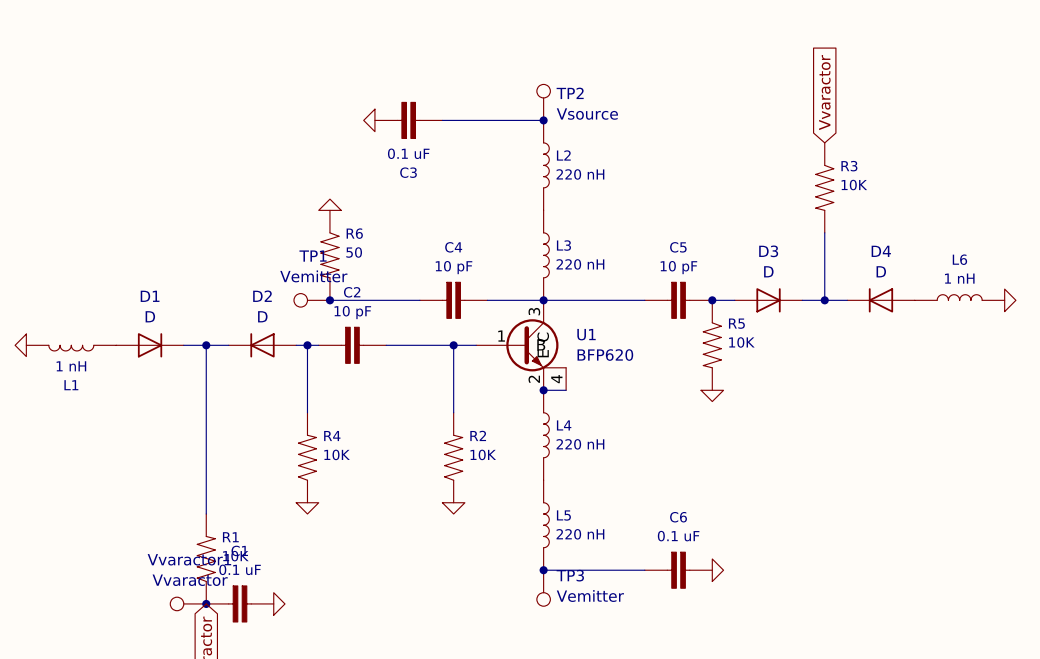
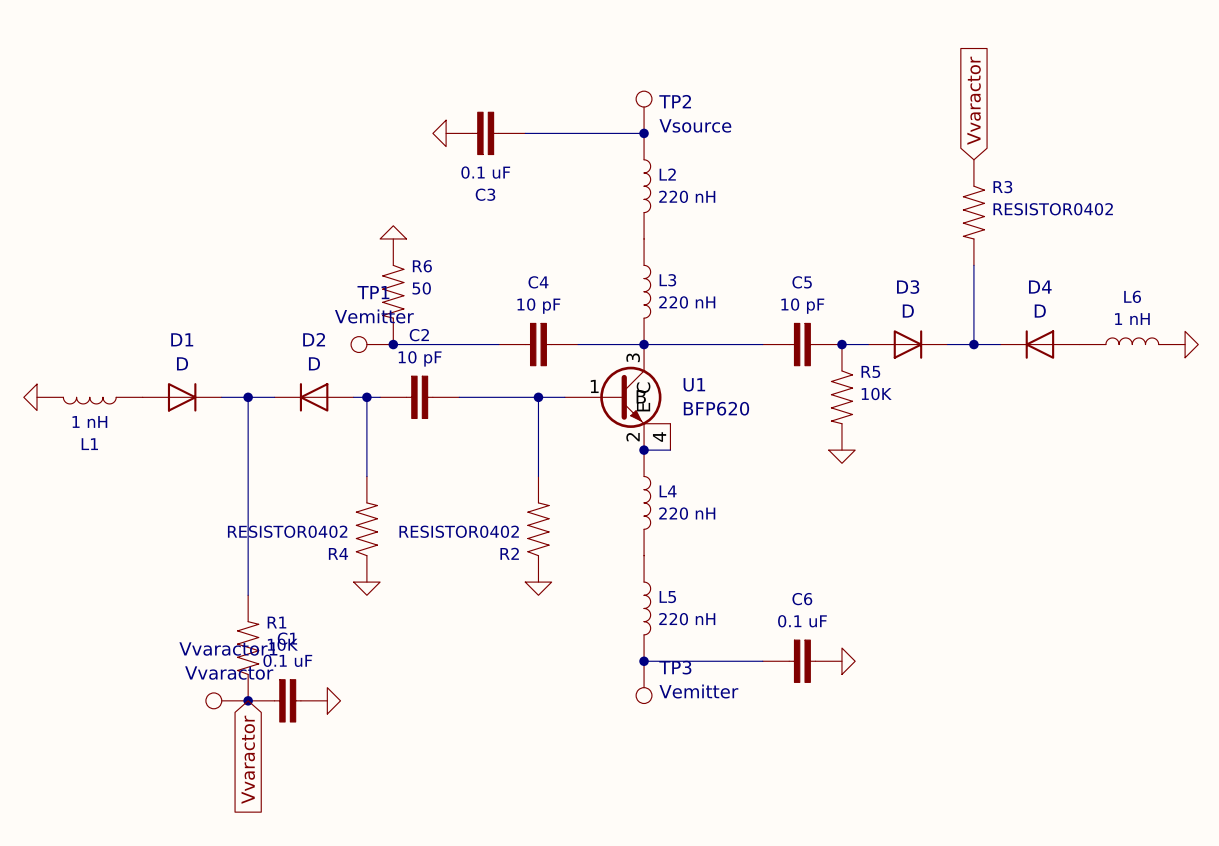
R3 value: 10K (854, 185) -> RESISTOR0402 (1053, 209)
R2 name position: R2 (478, 435) -> R2 (509, 553)
R4 name position: R4 (332, 436) -> R4 (338, 553)
R4 value: 10K (337, 454) -> RESISTOR0402 (287, 531)
R2 value: 10K (483, 454) -> RESISTOR0402 (459, 531)

